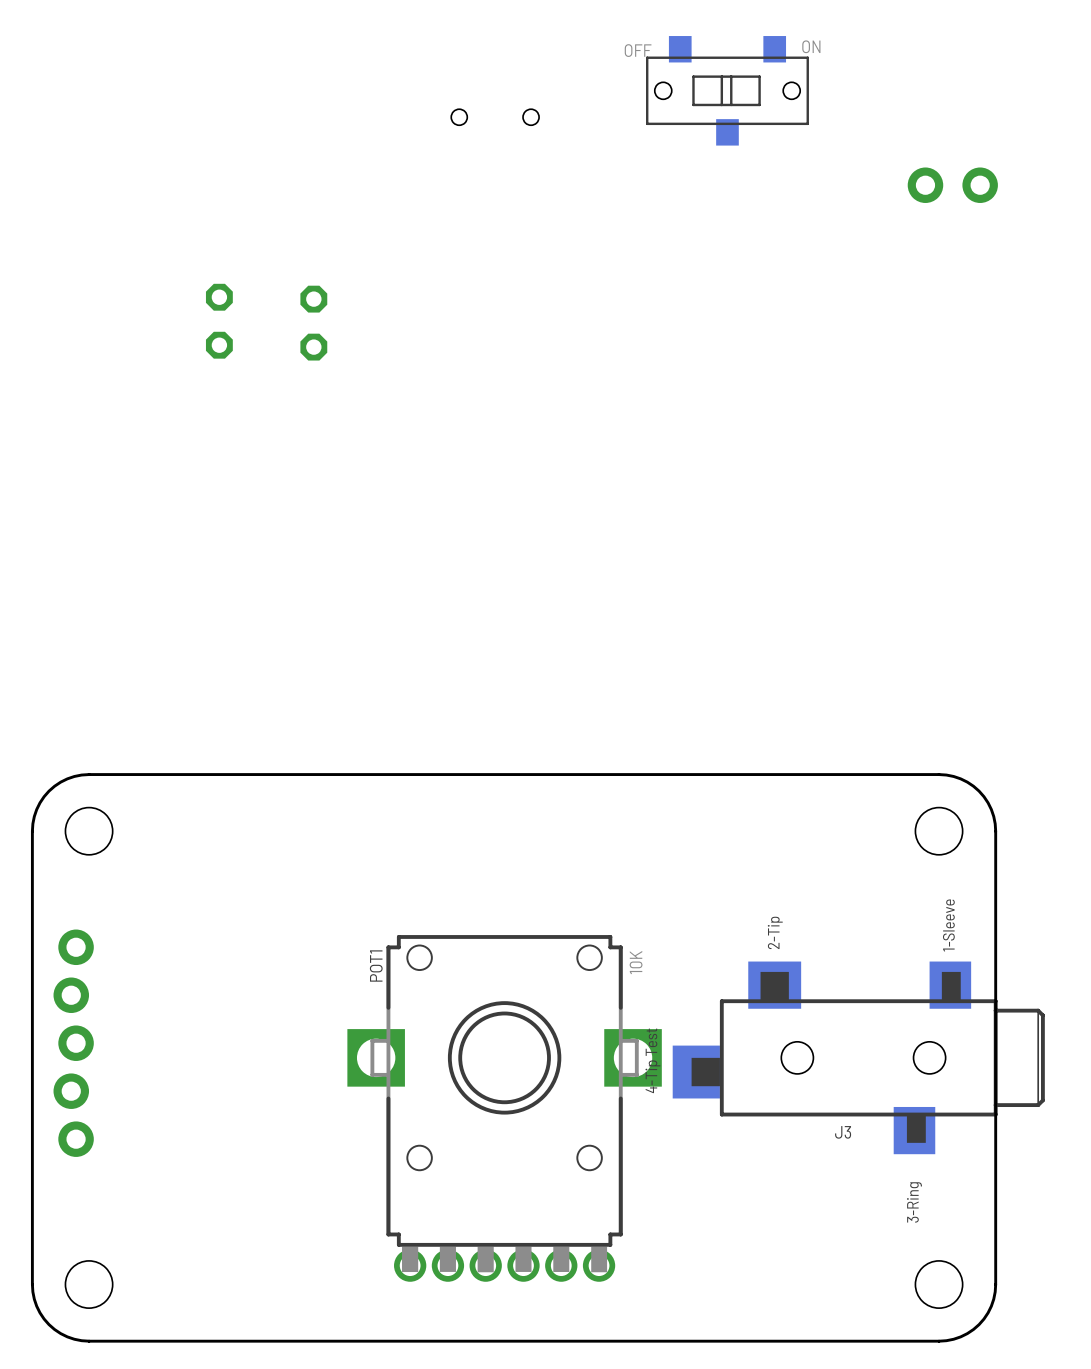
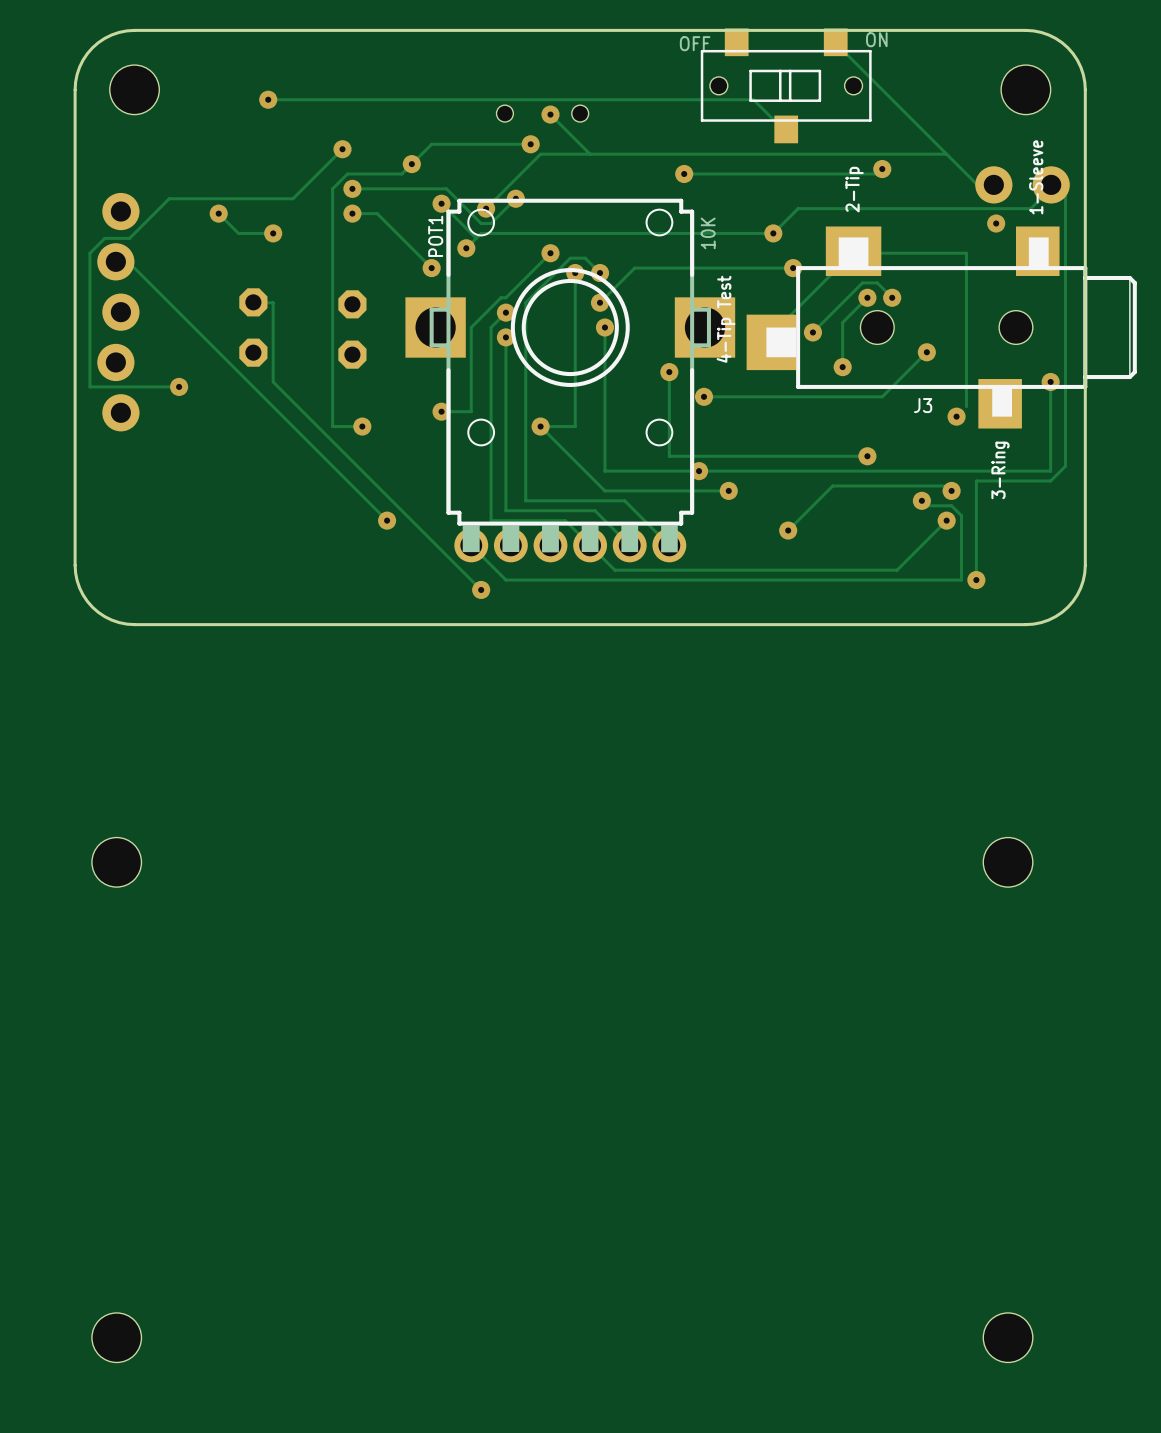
board edge: none -> (1025, 30) (134, 30) (119, 32) (104, 38) (92, 47) (83, 60) (77, 74) (75, 89) (75, 565) (77, 580) (83, 594) (92, 607) (104, 616) (119, 622) (134, 624) (1025, 624) (1041, 622) (1055, 616) (1067, 607) (1077, 594) (1083, 580) (1085, 565) (1085, 89) (1080, 67) (1067, 47) (1048, 34) (1025, 30)
track: none -> (835, 42) (976, 183) (993, 184)
hole: none -> (134, 89)
hole: none -> (1025, 89)
track: none -> (268, 99) (753, 99) (783, 129) (786, 129)
via: none -> (268, 99)
track: none -> (550, 114) (590, 154)
via: none -> (550, 114)
track: none -> (530, 144) (431, 144) (401, 174) (347, 174) (332, 188) (332, 426) (362, 426)
via: none -> (530, 144)
track: none -> (342, 149) (292, 198) (169, 198) (129, 238) (104, 238) (89, 253) (89, 386) (179, 386)
via: none -> (342, 149)
track: none -> (946, 154) (540, 154) (486, 208)
via: none -> (411, 164)
track: none -> (882, 169) (877, 174) (684, 174)
via: none -> (882, 169)
via: none -> (684, 174)
track: none -> (352, 188) (446, 188) (481, 223) (491, 223) (515, 198)
via: none -> (352, 188)
via: none -> (515, 198)
track: none -> (441, 203) (476, 238)
via: none -> (441, 203)
via: none -> (486, 208)
track: none -> (218, 213) (238, 233) (273, 233)
via: none -> (218, 213)
track: none -> (352, 213) (377, 213) (431, 268)
via: none -> (352, 213)
via: none -> (996, 223)
via: none -> (273, 233)
via: none -> (773, 233)
track: none -> (466, 248) (481, 233) (773, 233) (798, 208) (1030, 208) (1050, 188) (1051, 184) (1055, 188) (1065, 188) (1065, 466) (1050, 481) (976, 481) (976, 580)
via: none -> (466, 248)
track: none -> (550, 253) (505, 297) (500, 297) (471, 327) (471, 411) (441, 411)
via: none -> (550, 253)
track: none -> (115, 261) (129, 263) (387, 520)
via: none -> (431, 268)
track: none -> (793, 268) (634, 268) (600, 302)
via: none -> (793, 268)
track: none -> (575, 273) (575, 426) (540, 426) (604, 490) (728, 490)
via: none -> (575, 273)
track: none -> (600, 273) (585, 258) (570, 258) (525, 302) (525, 500) (624, 500) (669, 545)
via: none -> (600, 273)
track: none -> (867, 297) (842, 322) (842, 367)
via: none -> (867, 297)
track: none -> (892, 297) (877, 282) (862, 282) (812, 332)
via: none -> (892, 297)
track: none -> (253, 302) (273, 302) (273, 381) (481, 589)
via: none -> (600, 302)
part: none -> (118, 312)
track: none -> (505, 312) (491, 327) (491, 520) (565, 520) (614, 570) (897, 570) (946, 520)
via: none -> (505, 312)
track: none -> (604, 327) (604, 471) (1050, 471) (1050, 381)
via: none -> (604, 327)
via: none -> (812, 332)
track: none -> (505, 337) (505, 510) (595, 510) (629, 545)
via: none -> (505, 337)
track: none -> (771, 342) (773, 342) (773, 332) (853, 251) (857, 253) (966, 253) (966, 406)
track: none -> (926, 352) (882, 396) (704, 396)
via: none -> (926, 352)
via: none -> (842, 367)
track: none -> (669, 372) (669, 456) (867, 456)
via: none -> (669, 372)
via: none -> (1050, 381)
via: none -> (179, 386)
via: none -> (704, 396)
via: none -> (441, 411)
via: none -> (956, 416)
via: none -> (362, 426)
via: none -> (540, 426)
via: none -> (867, 456)
via: none -> (699, 471)
via: none -> (728, 490)
track: none -> (951, 490) (946, 485) (832, 485) (788, 530)
via: none -> (951, 490)
track: none -> (921, 500) (926, 505) (951, 505) (961, 515) (961, 580) (505, 580) (471, 545)
via: none -> (921, 500)
via: none -> (387, 520)
via: none -> (946, 520)
via: none -> (788, 530)
via: none -> (976, 580)
via: none -> (481, 589)
board edge: (939, 774) (89, 774) (74, 776) (60, 782) (48, 791) (39, 802) (34, 816) (32, 831) (32, 1284) (34, 1299) (39, 1312) (48, 1324) (60, 1333) (74, 1339) (89, 1341) (939, 1341) (953, 1339) (967, 1333) (979, 1324) (988, 1312) (993, 1299) (995, 1284) (995, 831) (991, 809) (979, 791) (960, 778) (939, 774) -> none
part: (73, 1043) -> none
J3 position: (858, 1057) -> (941, 327)
POT1 position: (504, 1108) -> (570, 380)

